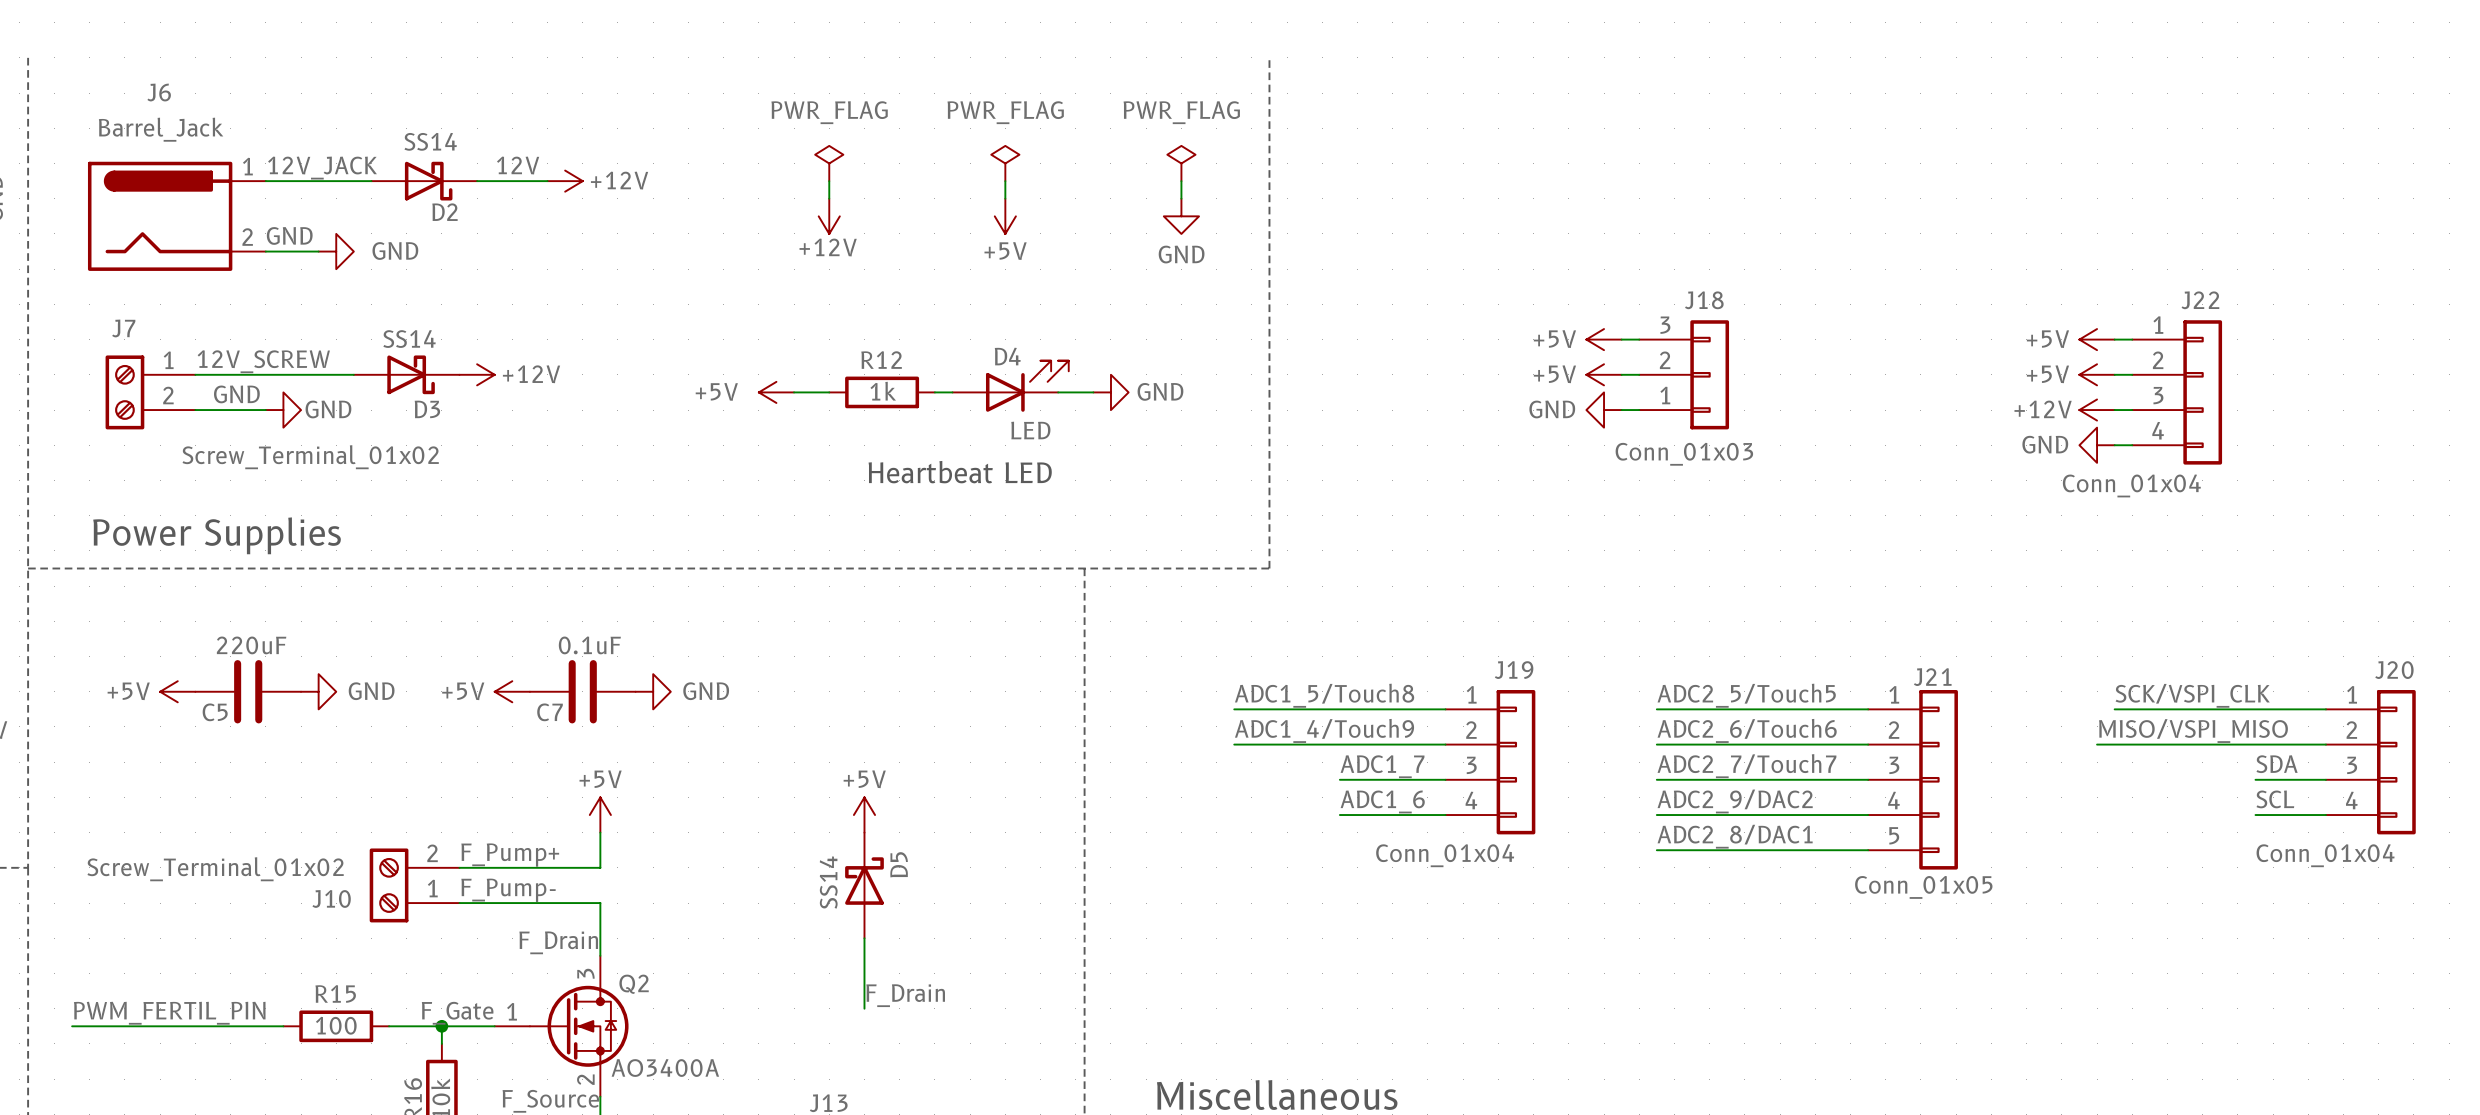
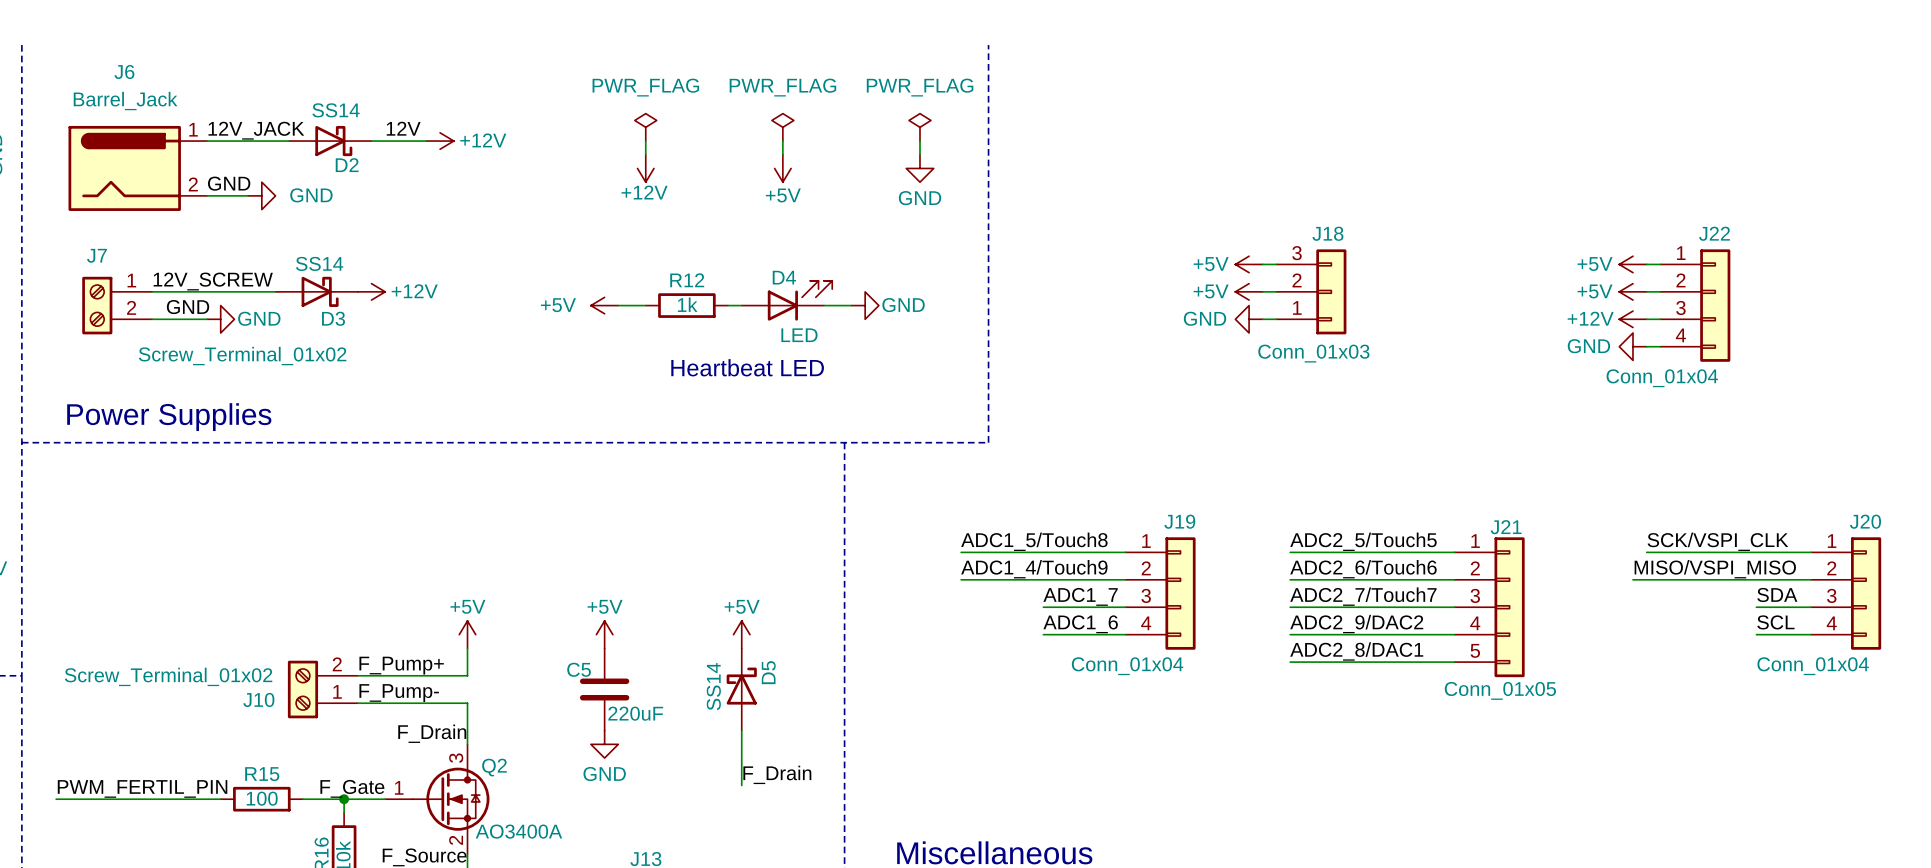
C5 value position: 220uF (251, 645) -> 220uF (635, 713)
power symbol: +5V (177, 691) -> none
C5 rotation: 0° (248, 691) -> 90° clockwise (604, 689)
C5 position: (248, 691) -> (604, 689)
power symbol: GND (318, 691) -> none
power symbol: +5V (512, 691) -> none
C7: 0.1uF (582, 691) -> none
power symbol: GND (653, 691) -> none
power symbol: none -> +5V (604, 634)
power symbol: +5V (864, 815) -> none
power symbol: none -> +5V (741, 634)
D5 position: (864, 885) -> (741, 689)
wire: (864, 938) (864, 1008) -> (741, 730) (741, 785)
power symbol: none -> GND (604, 744)
label position: F_Drain (905, 995) -> F_Drain (777, 774)

